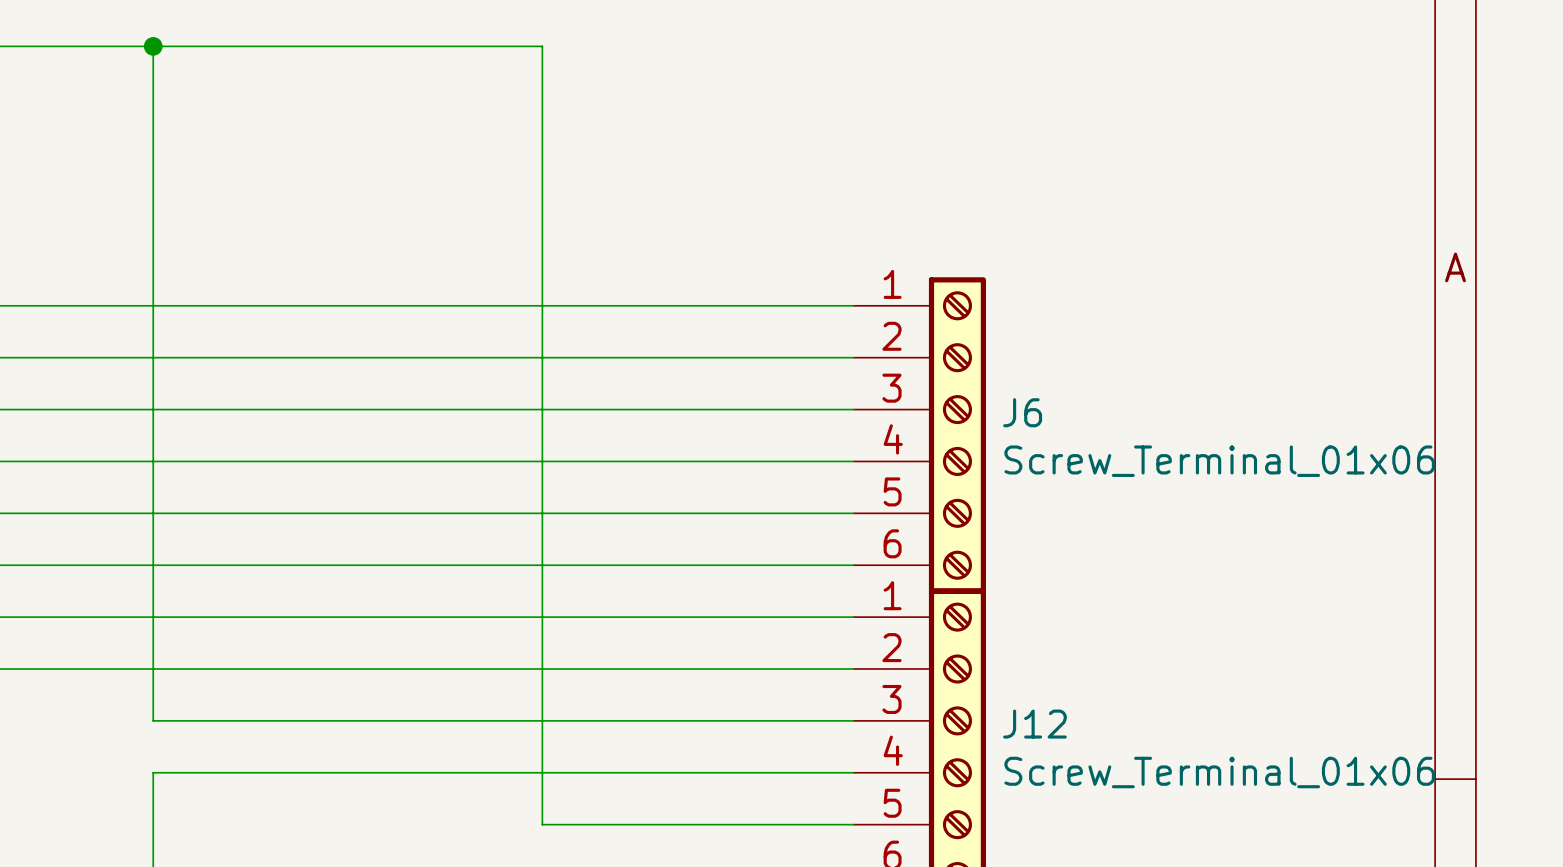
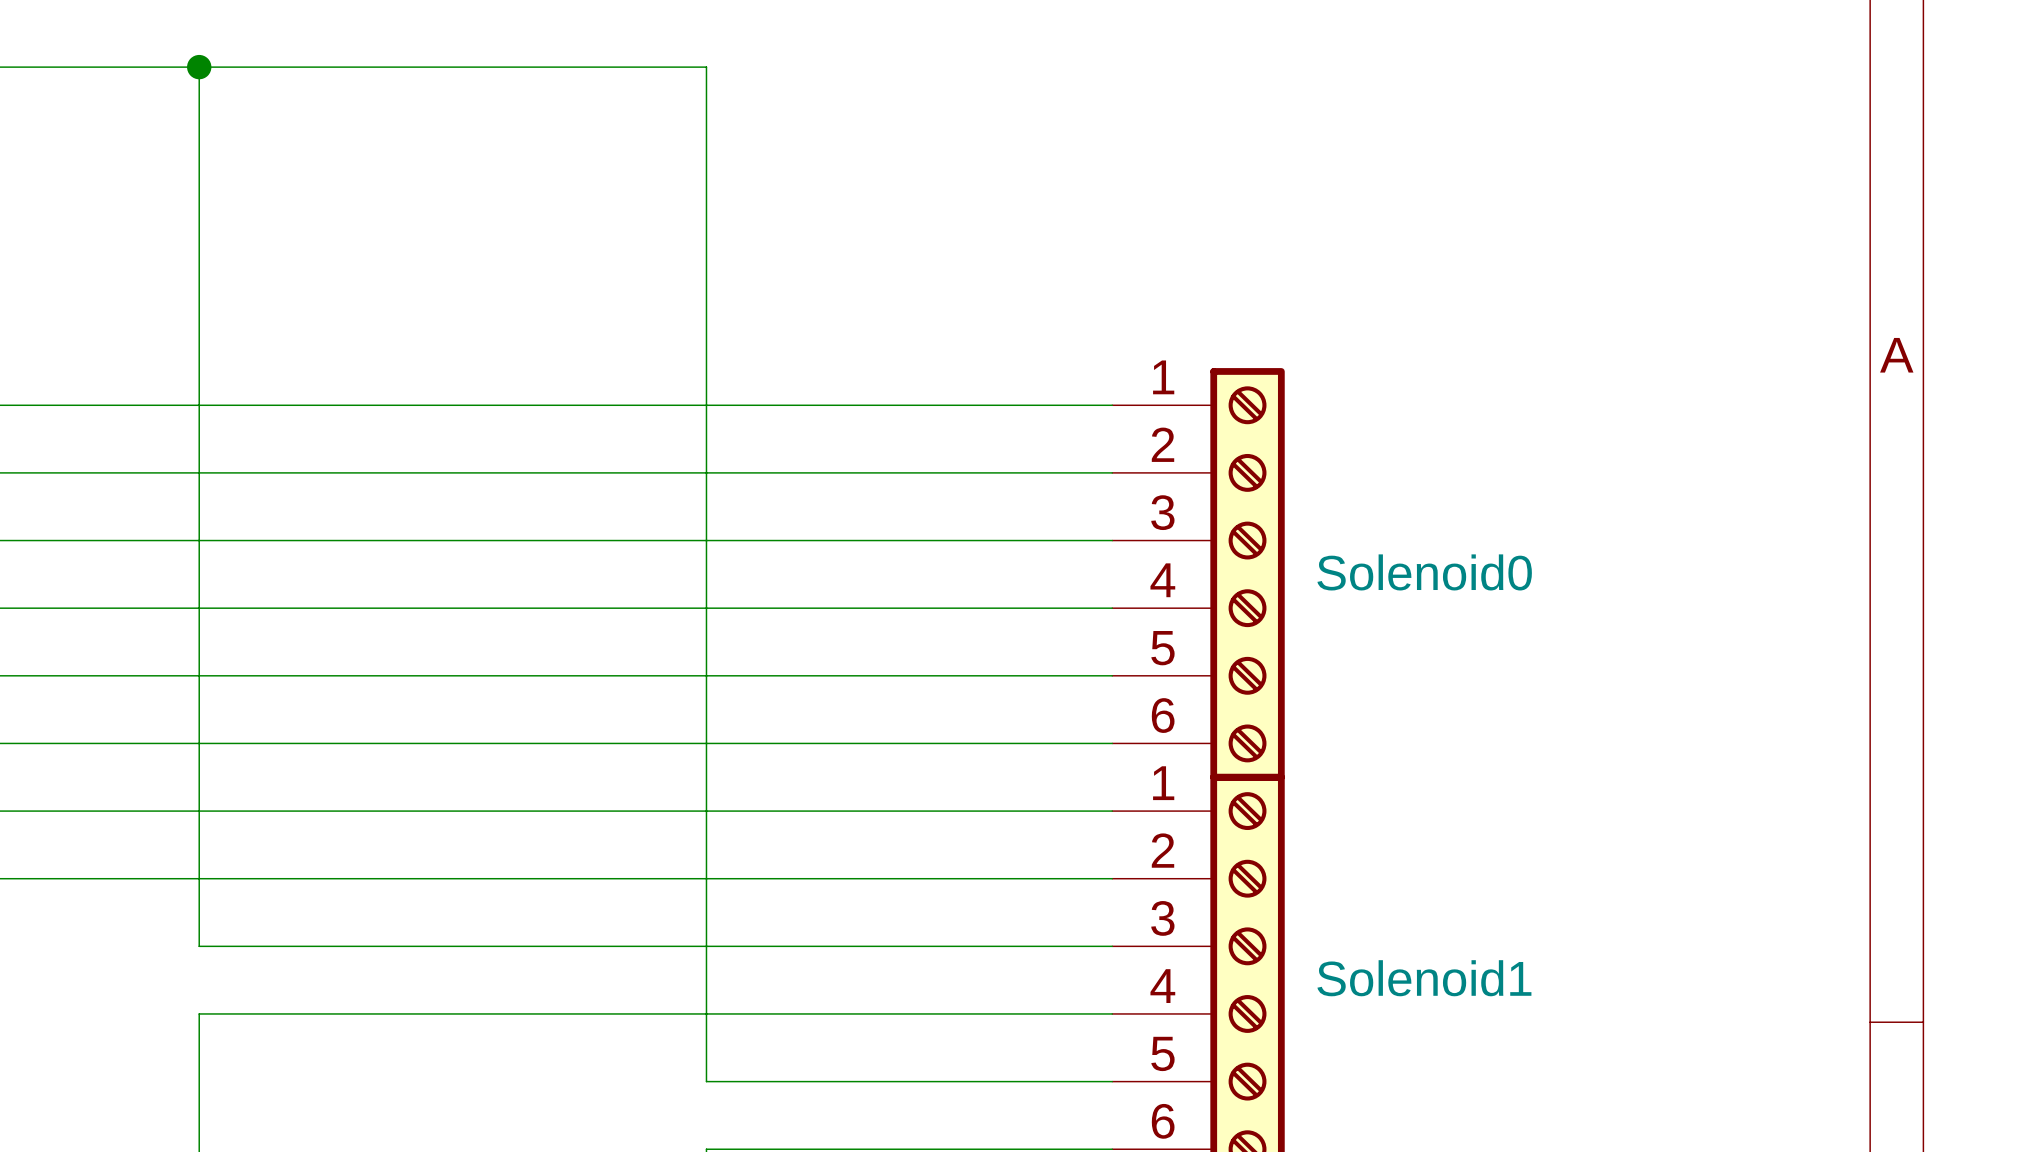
J6 name: J6 (1022, 412) -> Solenoid0 (1424, 572)
J6 value: Screw_Terminal_01x06 (1219, 461) -> none
J12 name: J12 (1034, 724) -> Solenoid1 (1424, 978)
J12 value: Screw_Terminal_01x06 (1219, 772) -> none

